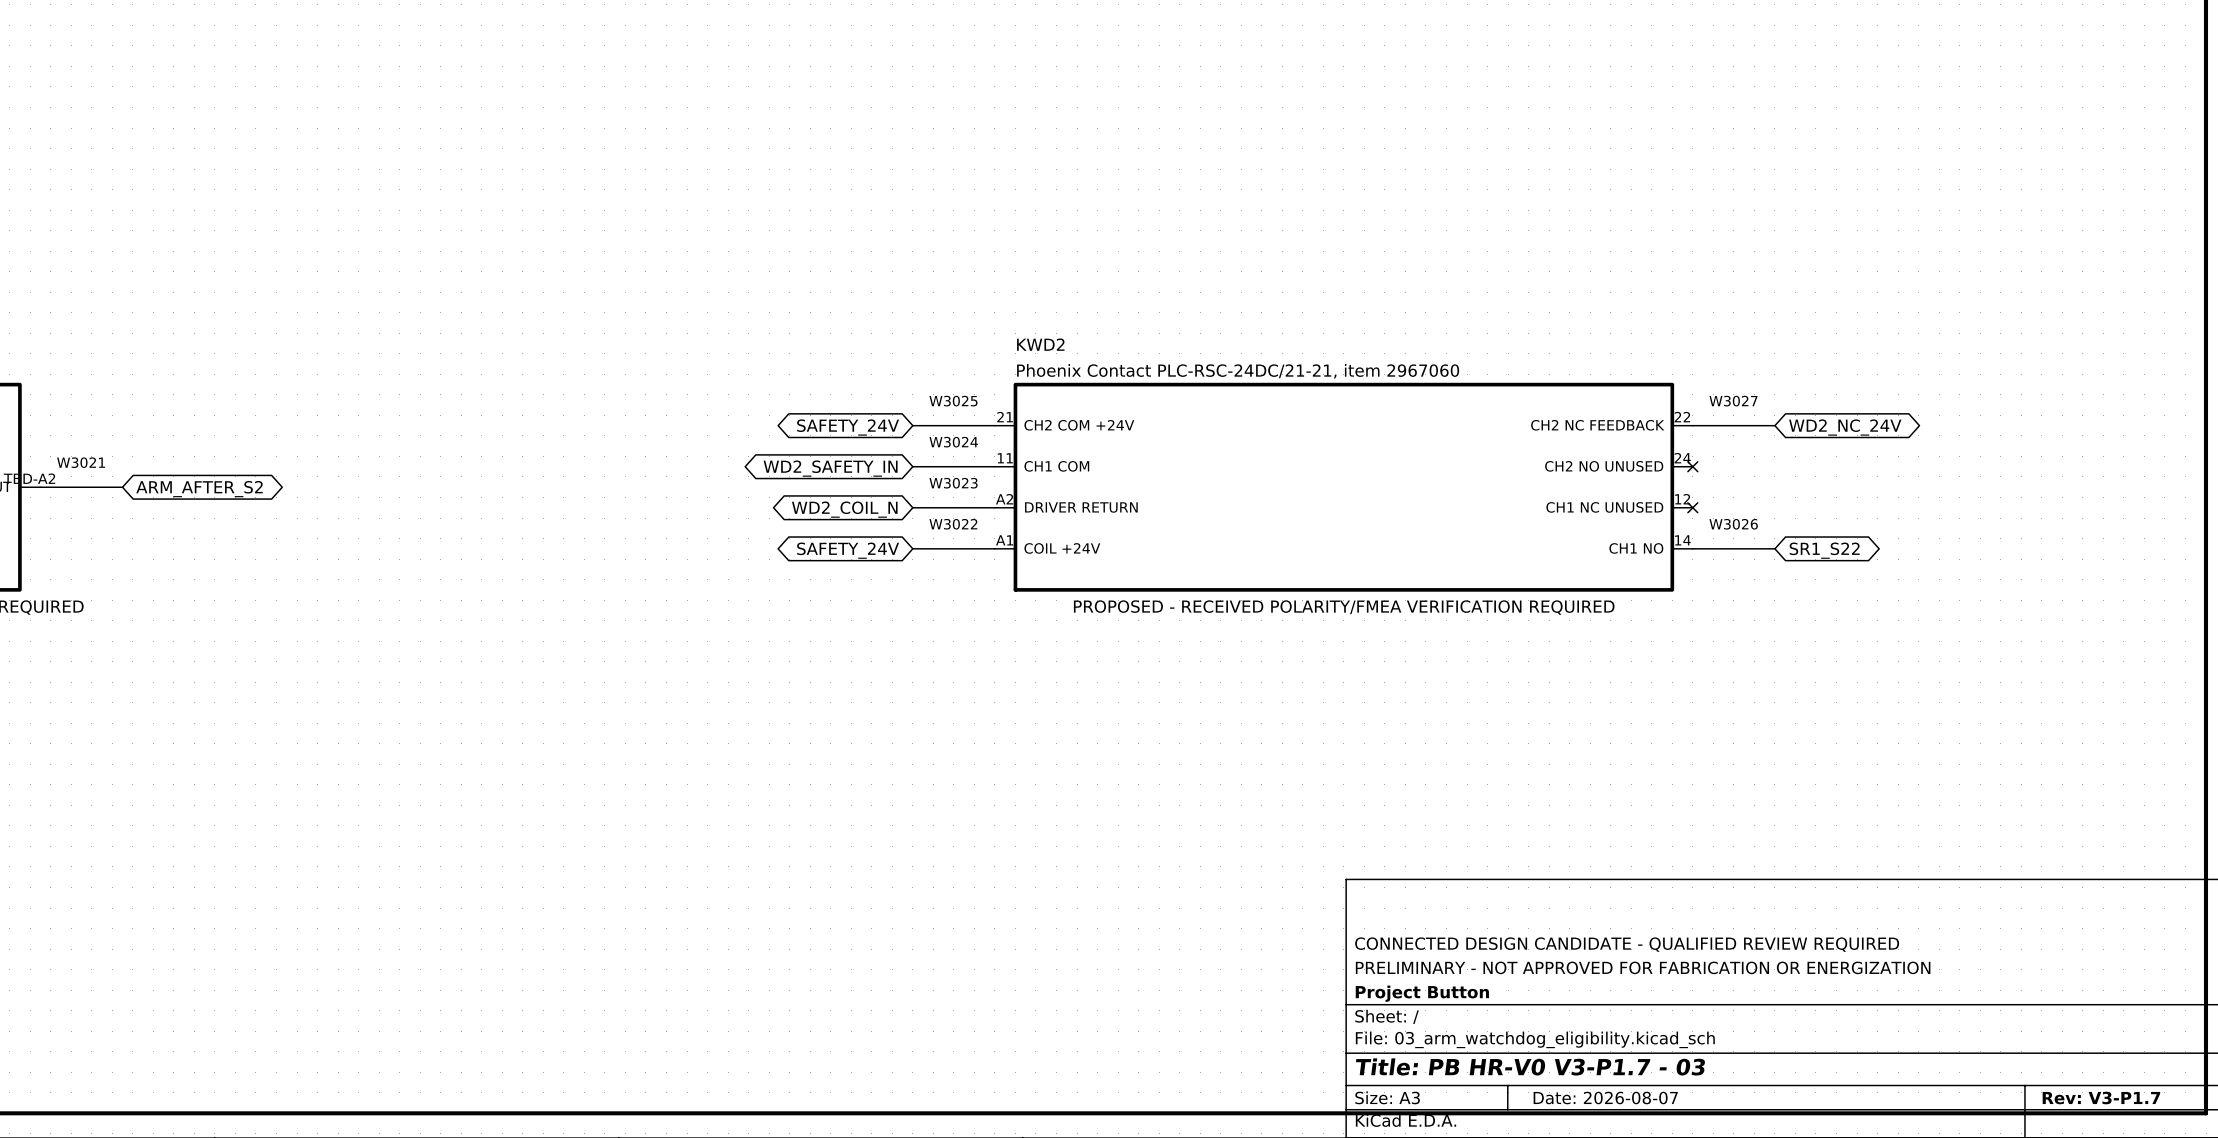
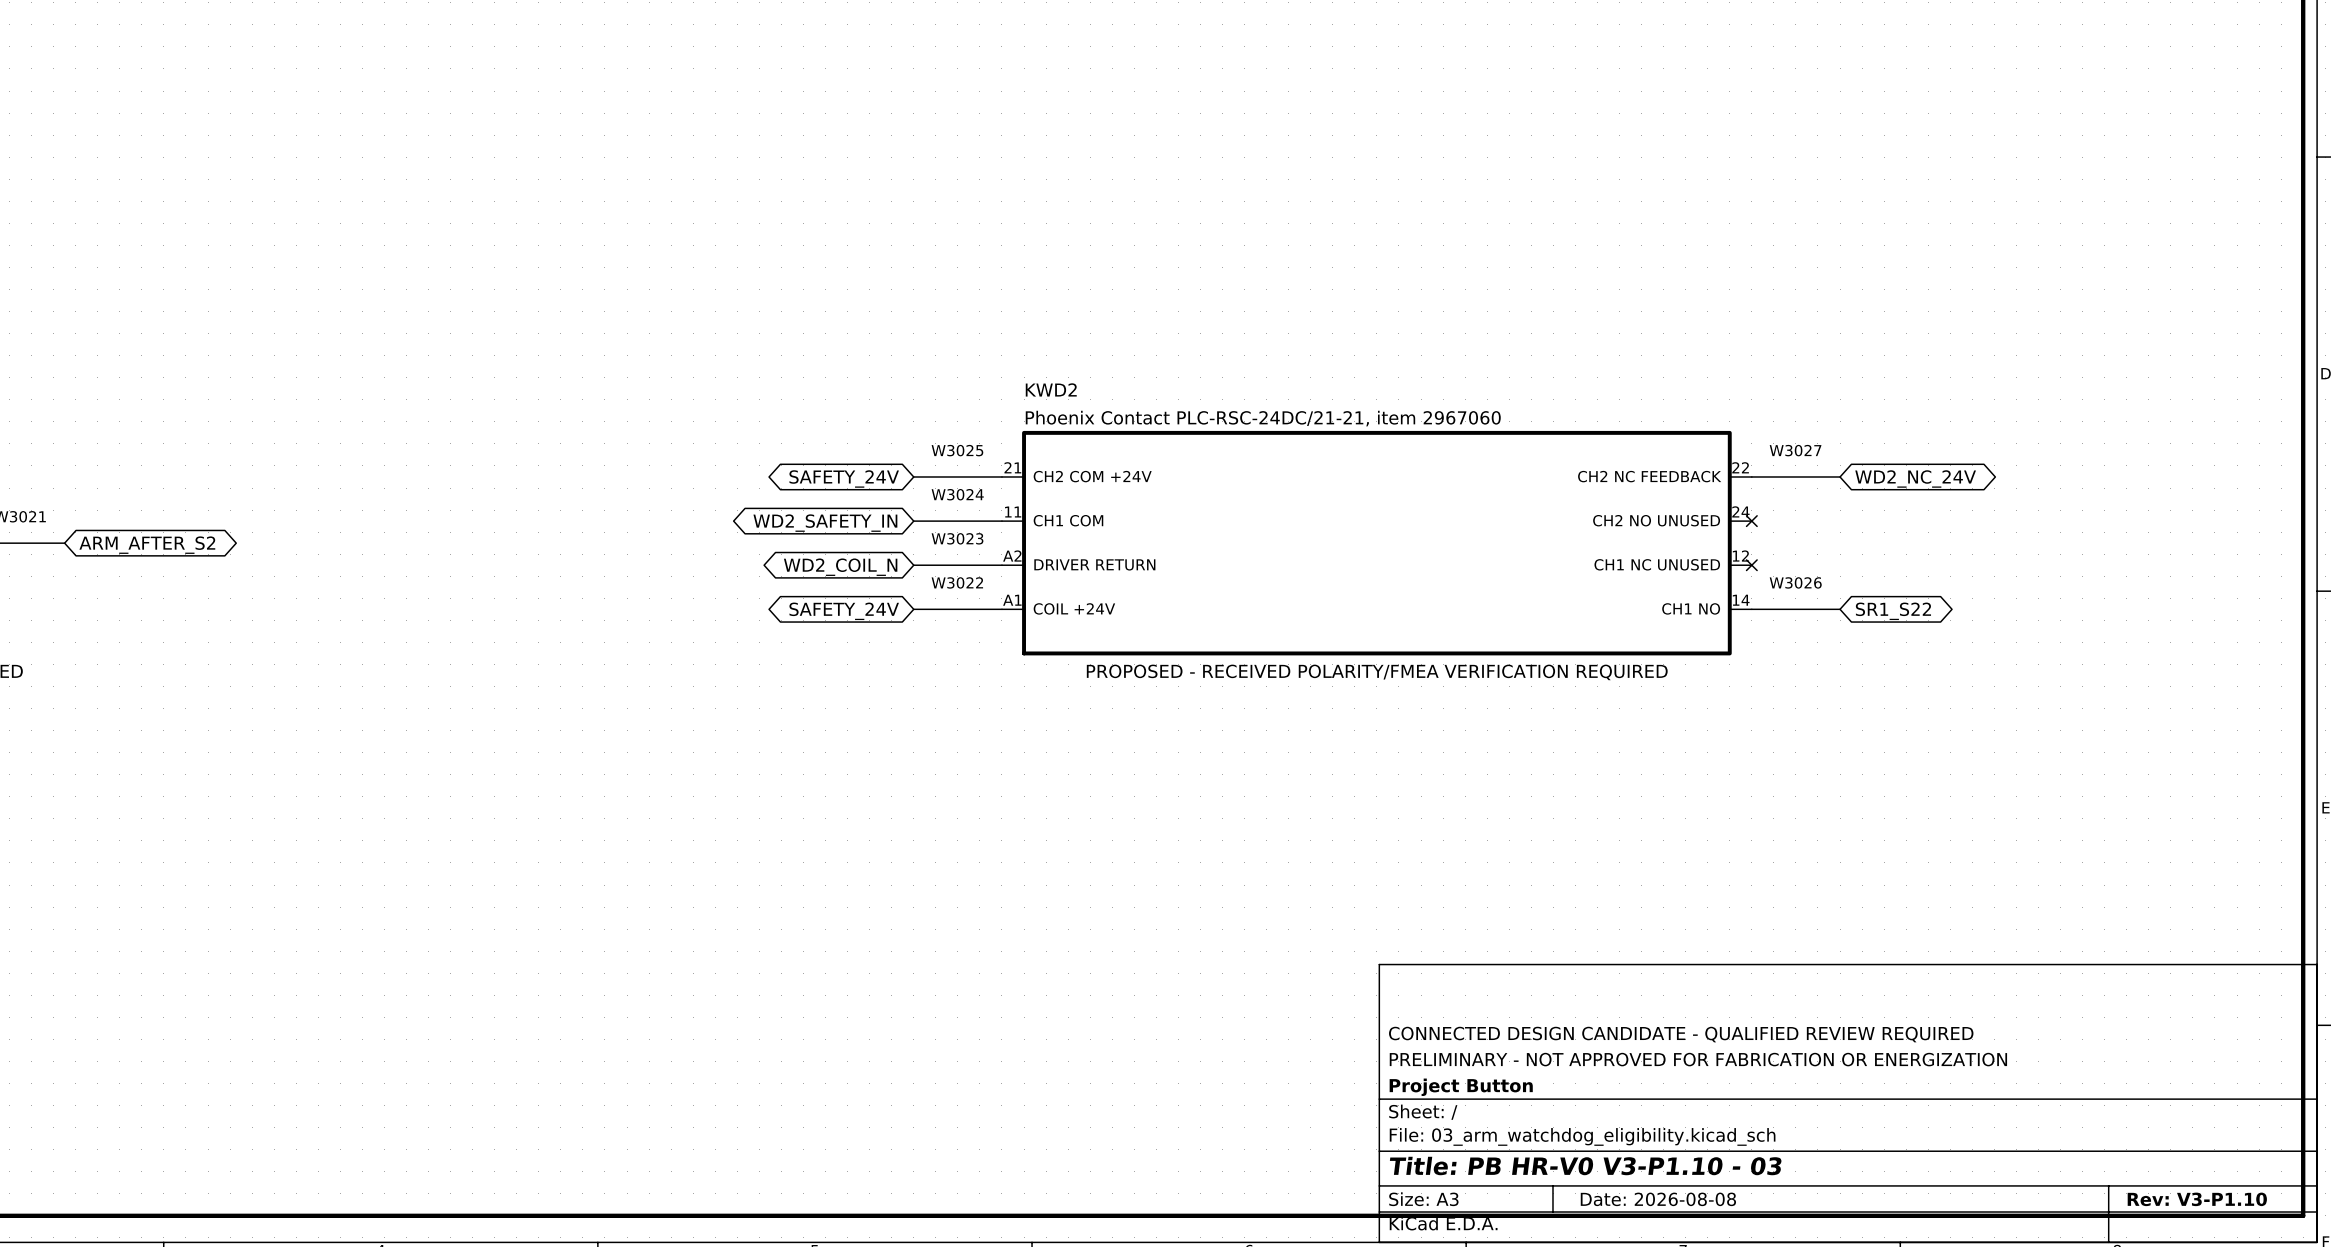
title block: Title: PB HR-V0 V3-P1.7 - 03 (1530, 1066) -> Title: PB HR-V0 V3-P1.10 - 03 (1585, 1166)
title block: Date: 2026-08-07 (1605, 1098) -> Date: 2026-08-08 (1658, 1199)
title block: Rev: V3-P1.7 (2101, 1098) -> Rev: V3-P1.10 (2197, 1199)

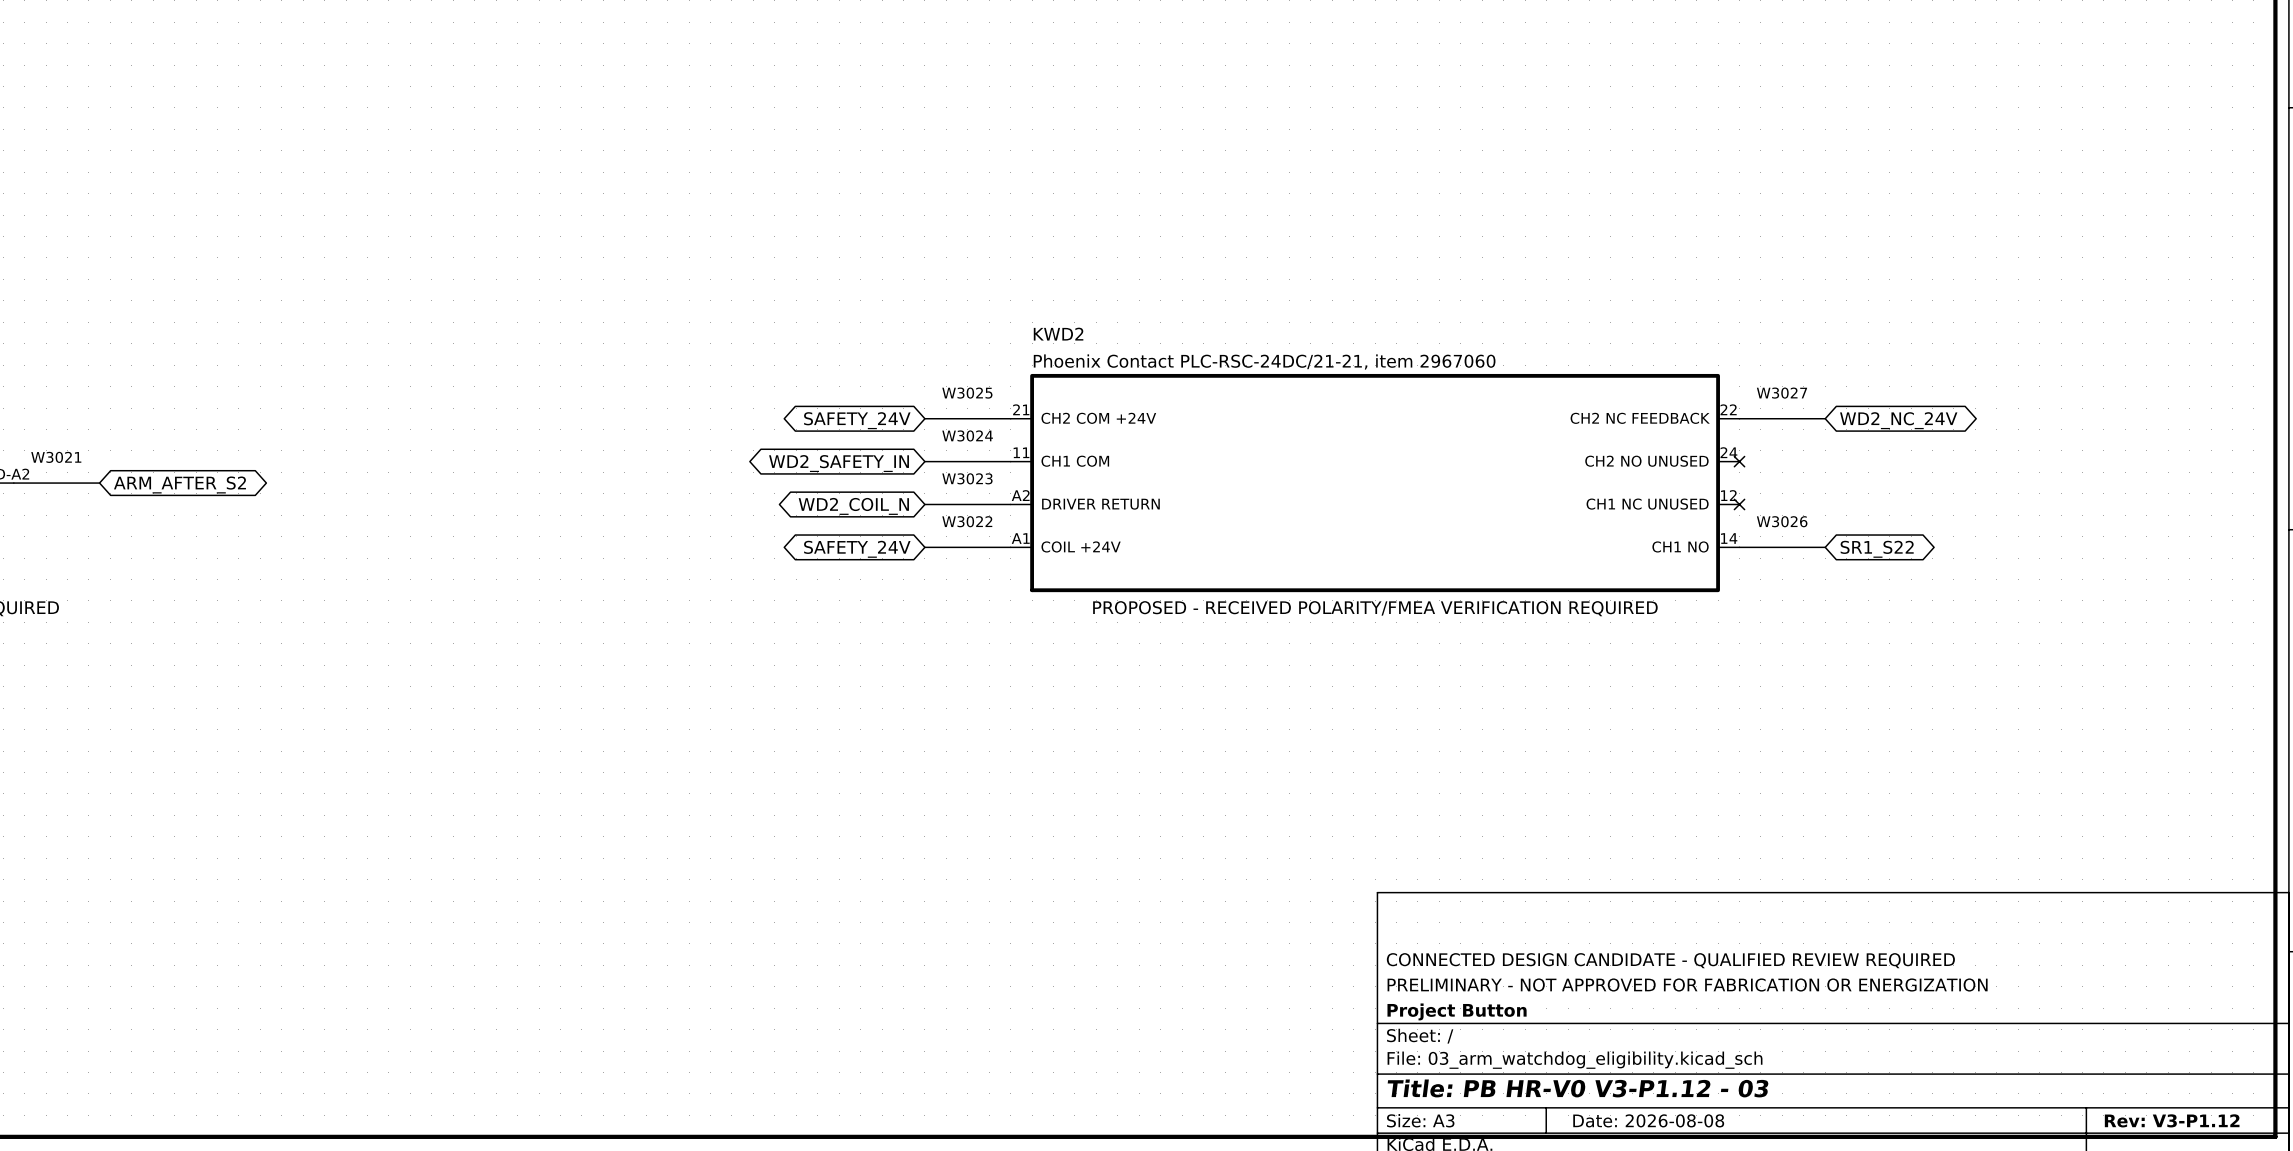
title block: Title: PB HR-V0 V3-P1.10 - 03 (1585, 1166) -> Title: PB HR-V0 V3-P1.12 - 03 (1578, 1088)
title block: Rev: V3-P1.10 (2197, 1199) -> Rev: V3-P1.12 (2172, 1120)

